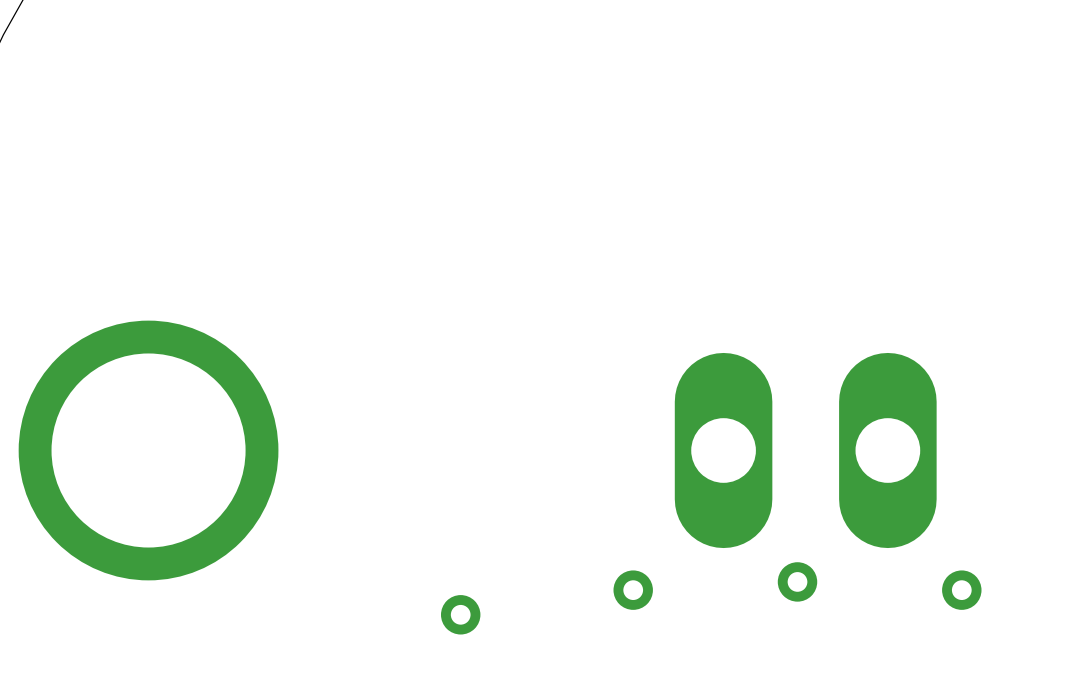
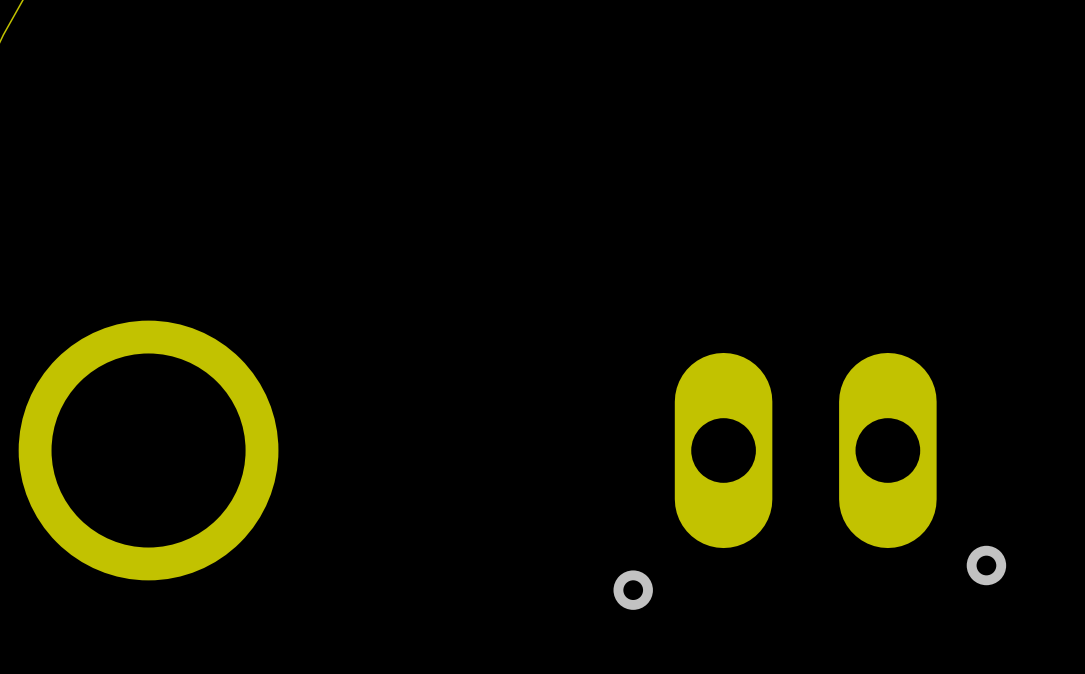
via: (797, 581) -> none
via position: (961, 590) -> (986, 565)
via: (460, 614) -> none

